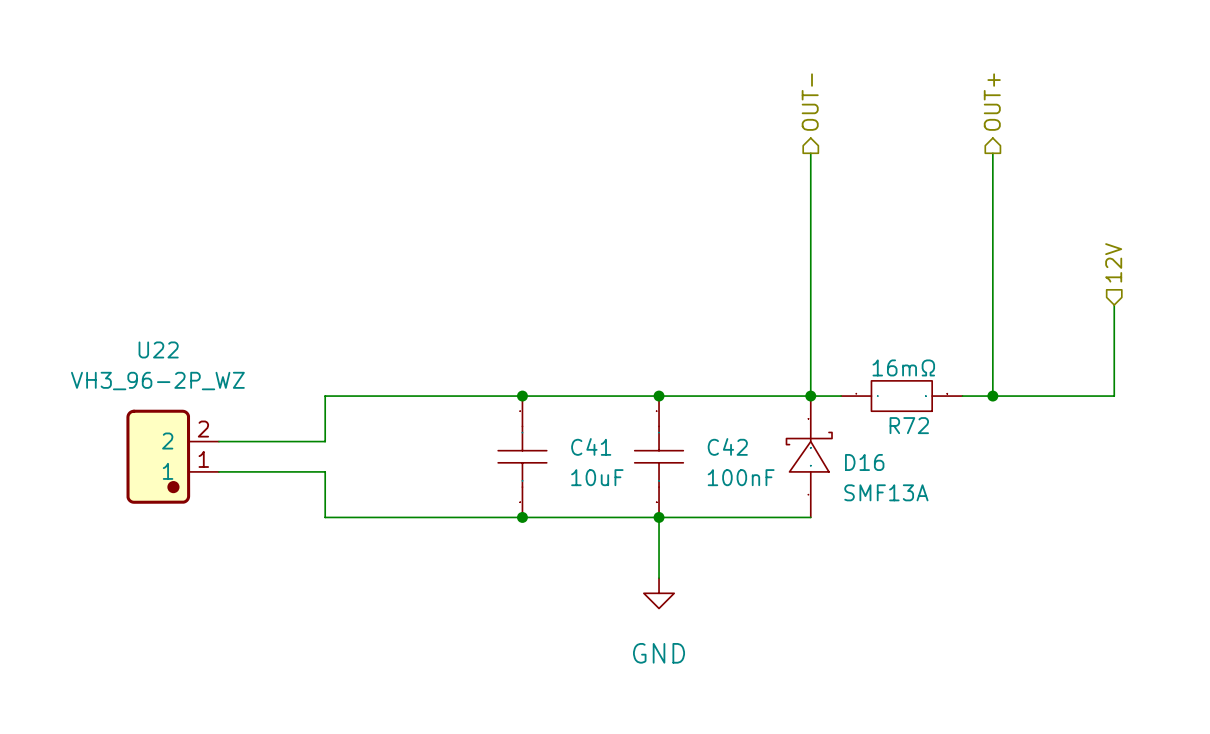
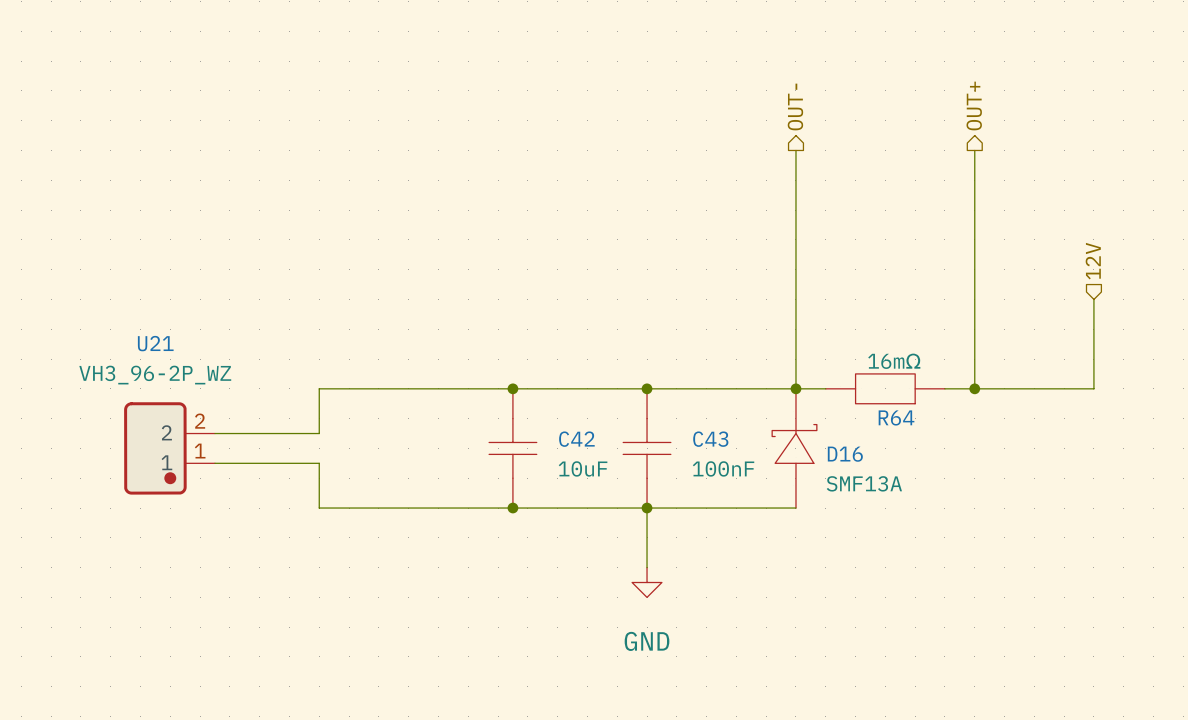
U22 name: U22 (158, 349) -> U21 (155, 343)
R72 name: R72 (909, 425) -> R64 (896, 417)
C41 name: C41 (591, 446) -> C42 (576, 439)
C42 name: C42 (727, 446) -> C43 (710, 439)

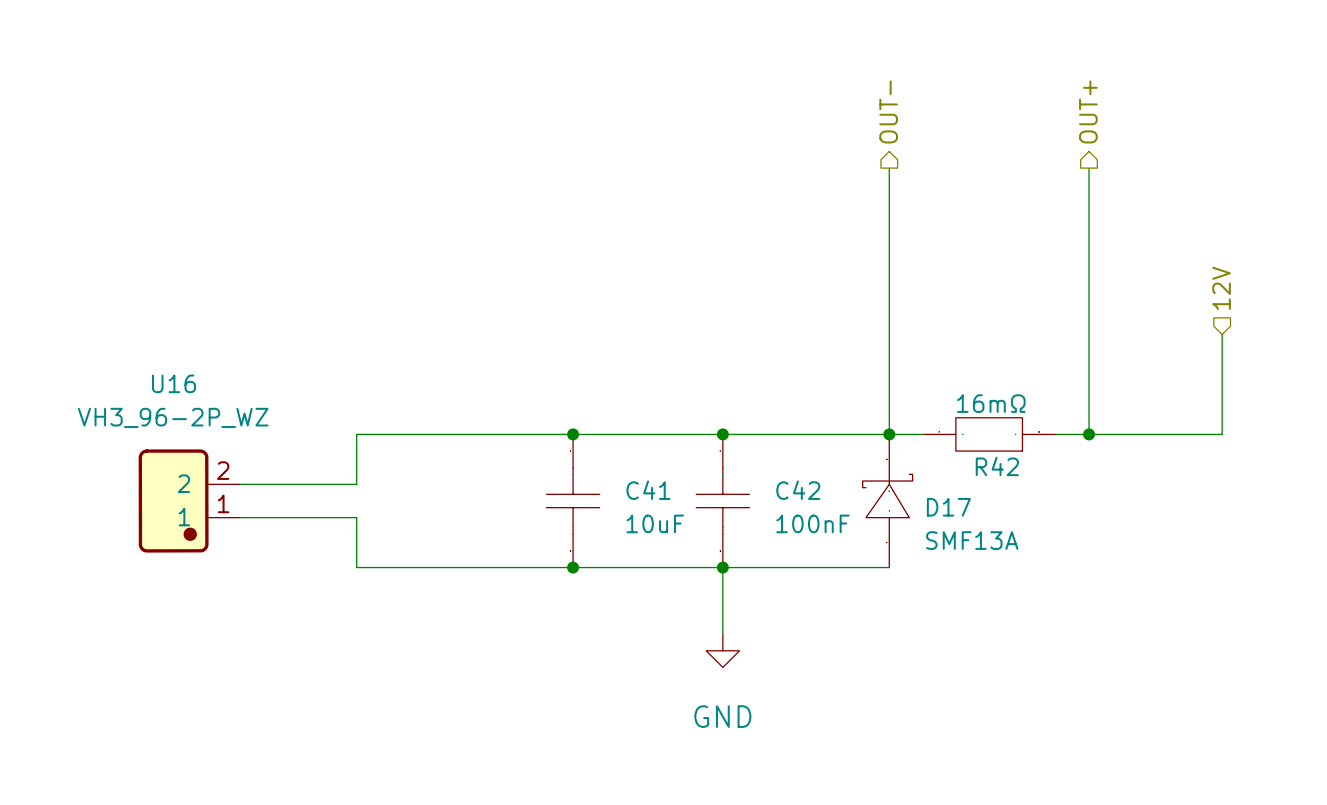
U21 name: U21 (155, 343) -> U16 (174, 383)
R64 name: R64 (896, 417) -> R42 (997, 466)
C42 name: C42 (576, 439) -> C41 (648, 490)
C43 name: C43 (710, 439) -> C42 (798, 490)
D16 name: D16 (845, 454) -> D17 (948, 507)

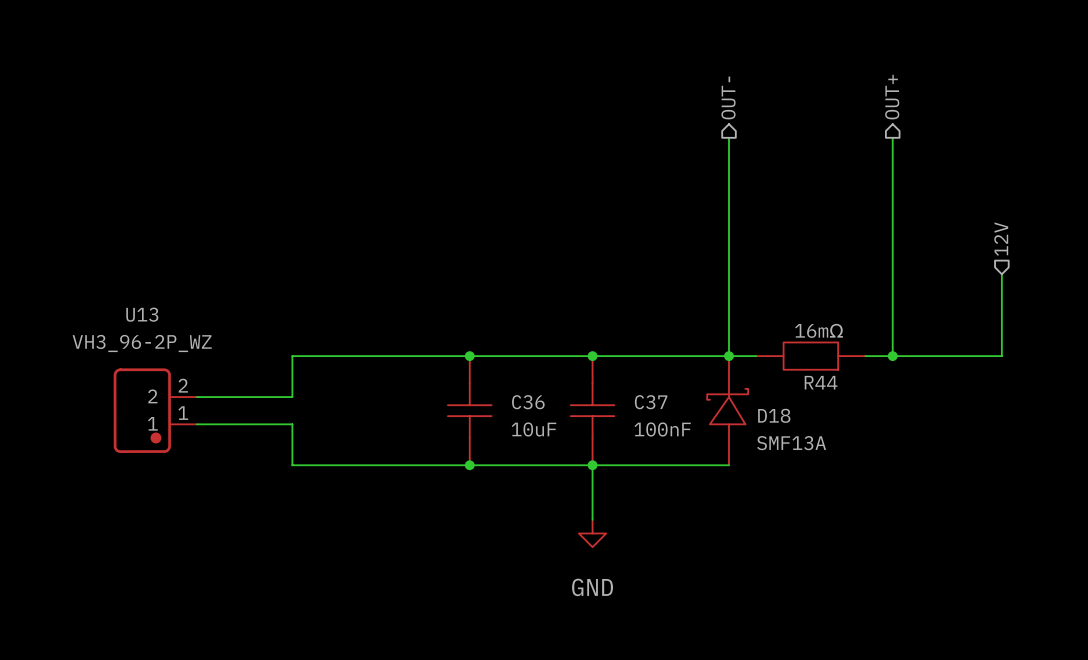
U16 name: U16 (174, 383) -> U13 (142, 314)
R42 name: R42 (997, 466) -> R44 (821, 382)
C41 name: C41 (648, 490) -> C36 (528, 402)
C42 name: C42 (798, 490) -> C37 (651, 402)
D17 name: D17 (948, 507) -> D18 (774, 415)

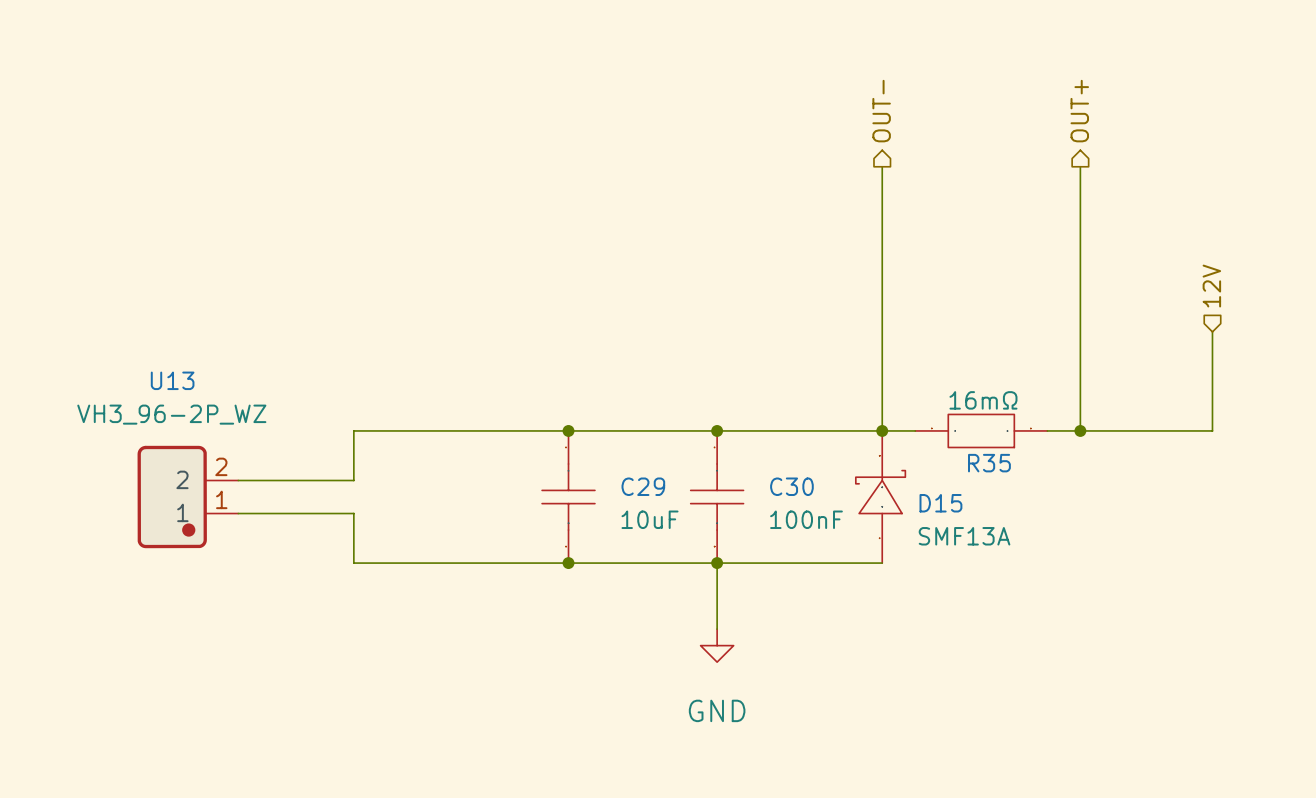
R44 name: R44 (821, 382) -> R35 (989, 463)
C36 name: C36 (528, 402) -> C29 (643, 486)
C37 name: C37 (651, 402) -> C30 (791, 486)
D18 name: D18 (774, 415) -> D15 (940, 503)

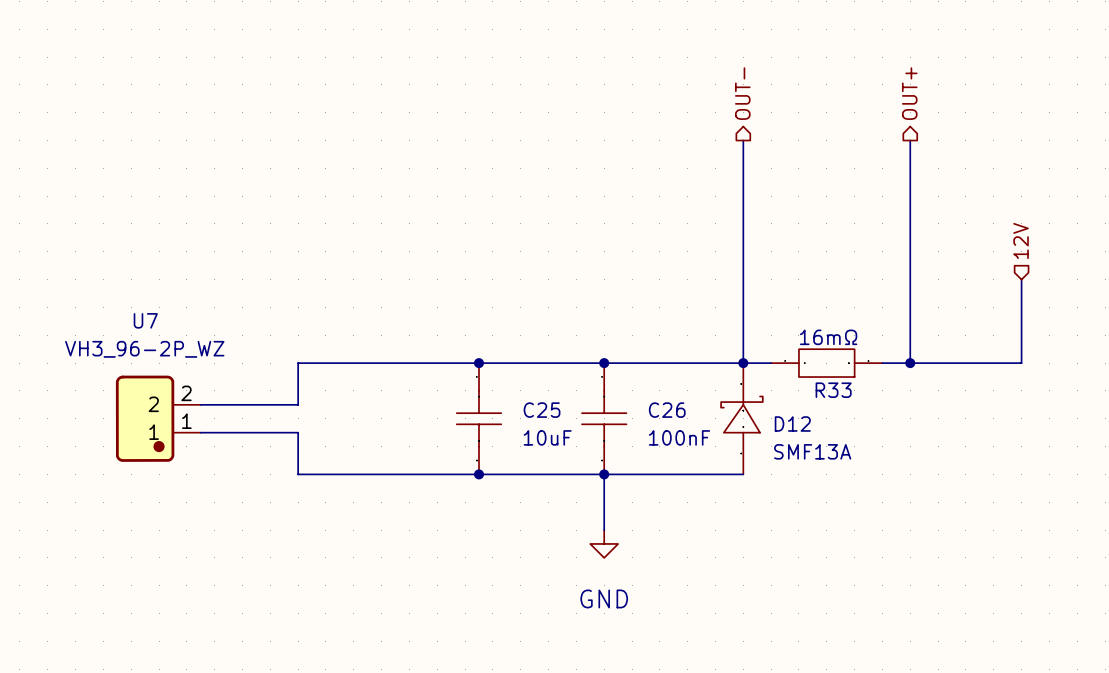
U13 name: U13 (172, 380) -> U7 (145, 320)
R35 name: R35 (989, 463) -> R33 (833, 390)
C29 name: C29 (643, 486) -> C25 (542, 410)
C30 name: C30 (791, 486) -> C26 (667, 410)
D15 name: D15 (940, 503) -> D12 (792, 424)

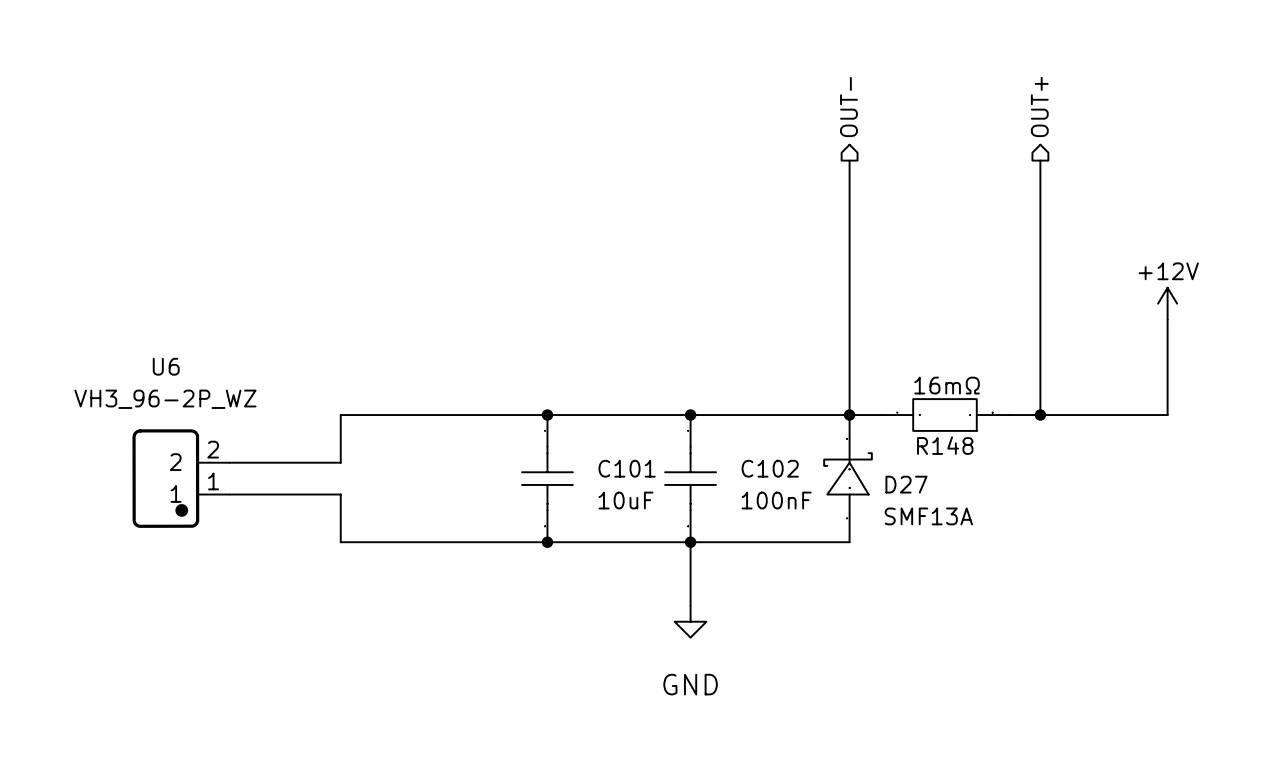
hierarchical label: 12V (1021, 240) -> none
power symbol: none -> +12V (1167, 303)
U7 name: U7 (145, 320) -> U6 (166, 366)
R33 name: R33 (833, 390) -> R148 (945, 445)
C25 name: C25 (542, 410) -> C101 (627, 468)
C26 name: C26 (667, 410) -> C102 (770, 468)
D12 name: D12 (792, 424) -> D27 (906, 484)

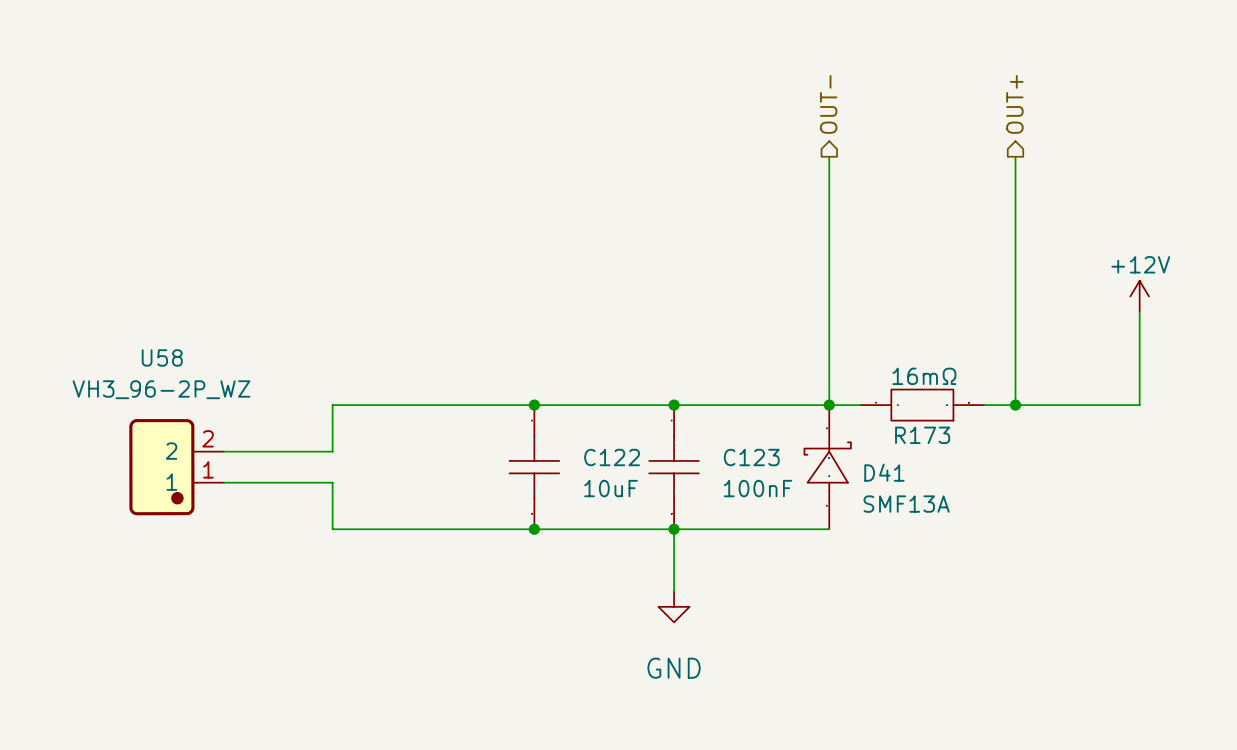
U6 name: U6 (166, 366) -> U58 (162, 357)
R148 name: R148 (945, 445) -> R173 (922, 435)
C101 name: C101 (627, 468) -> C122 (612, 457)
C102 name: C102 (770, 468) -> C123 (751, 457)
D27 name: D27 (906, 484) -> D41 (884, 472)

